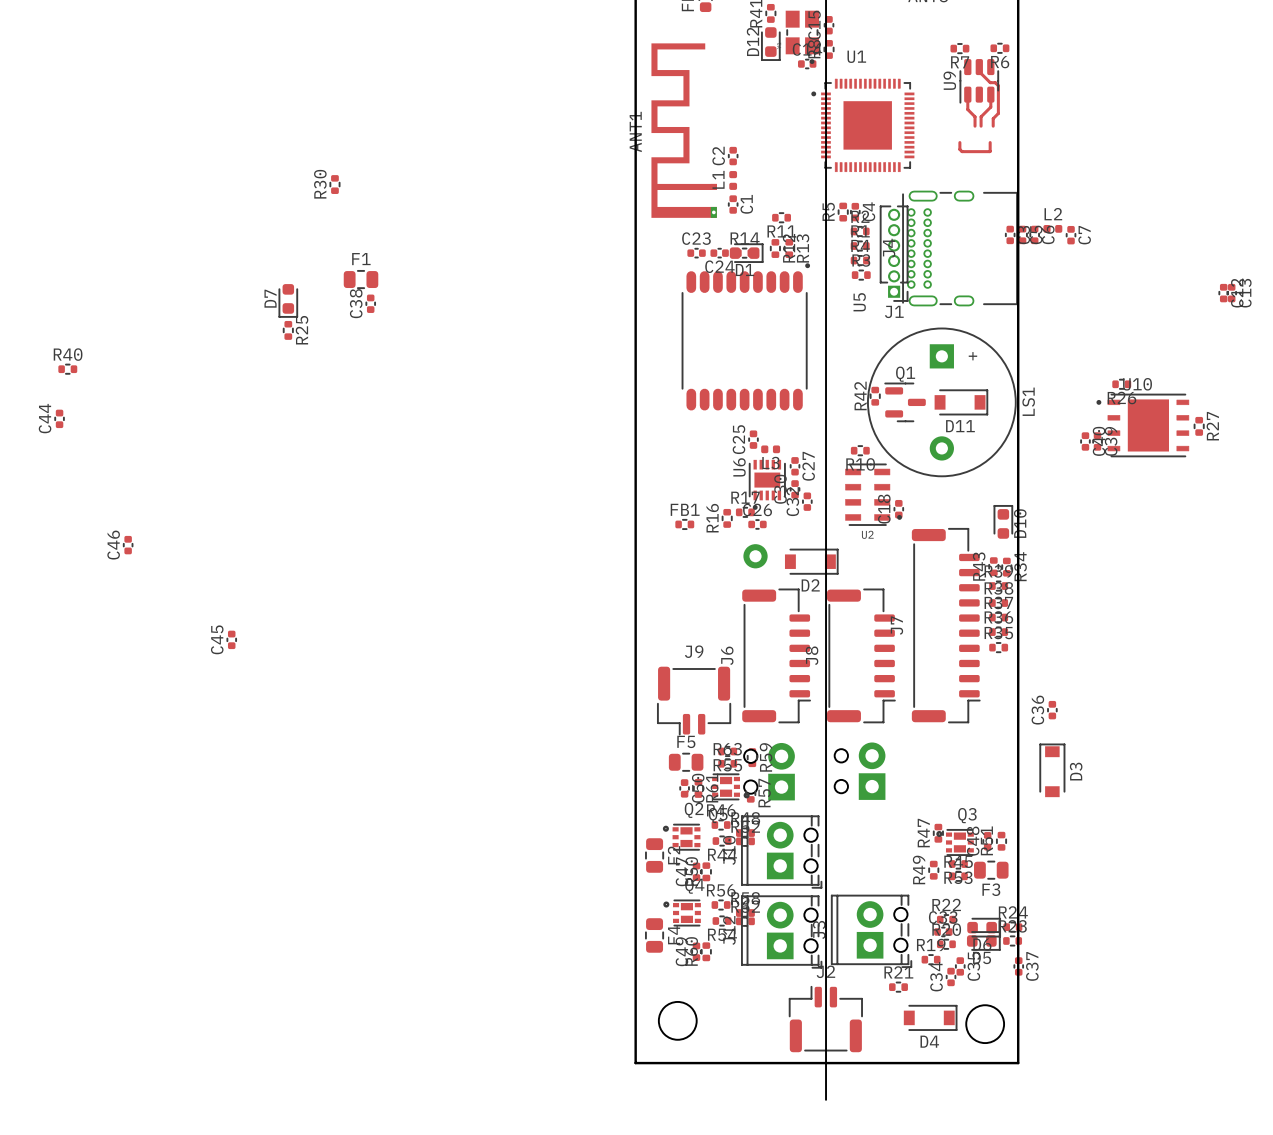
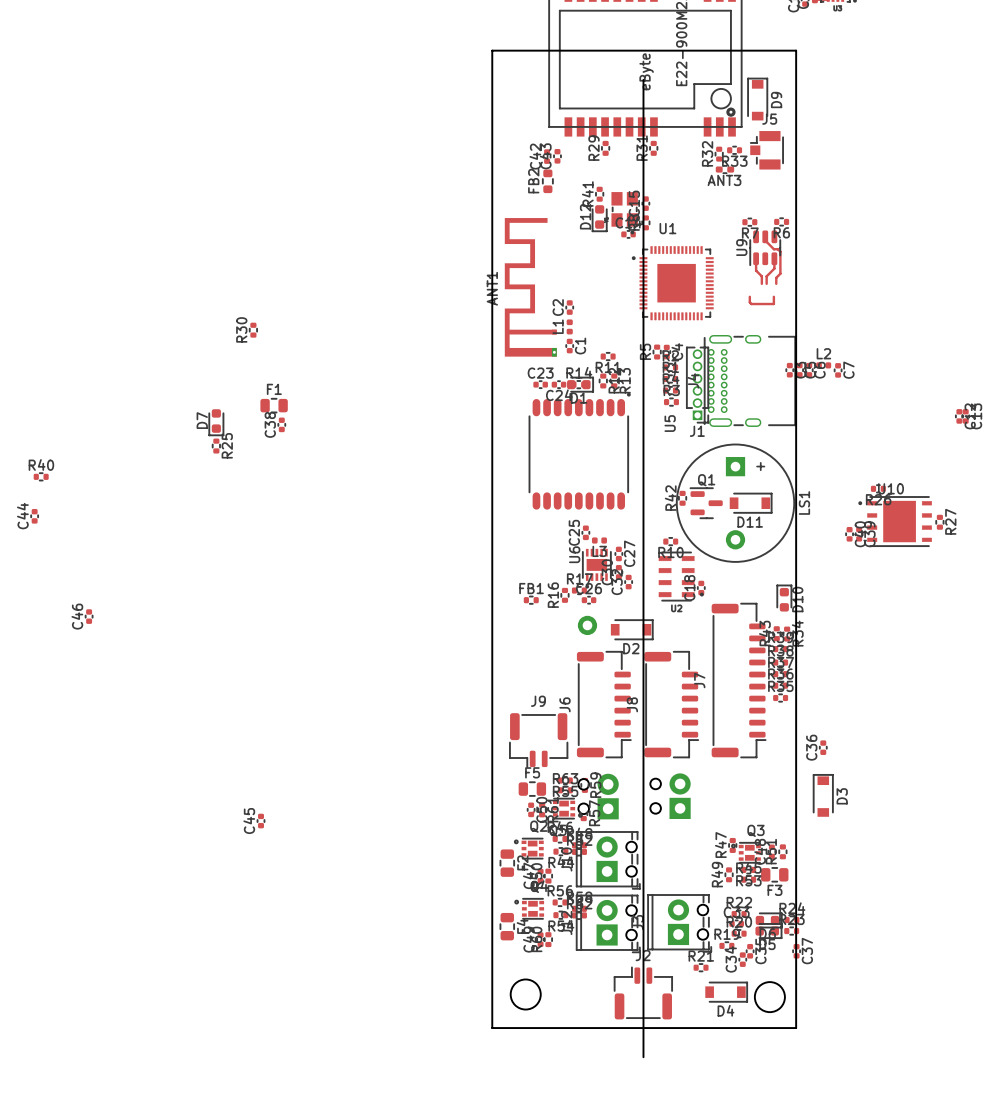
C45 position: (231, 639) -> (261, 821)

